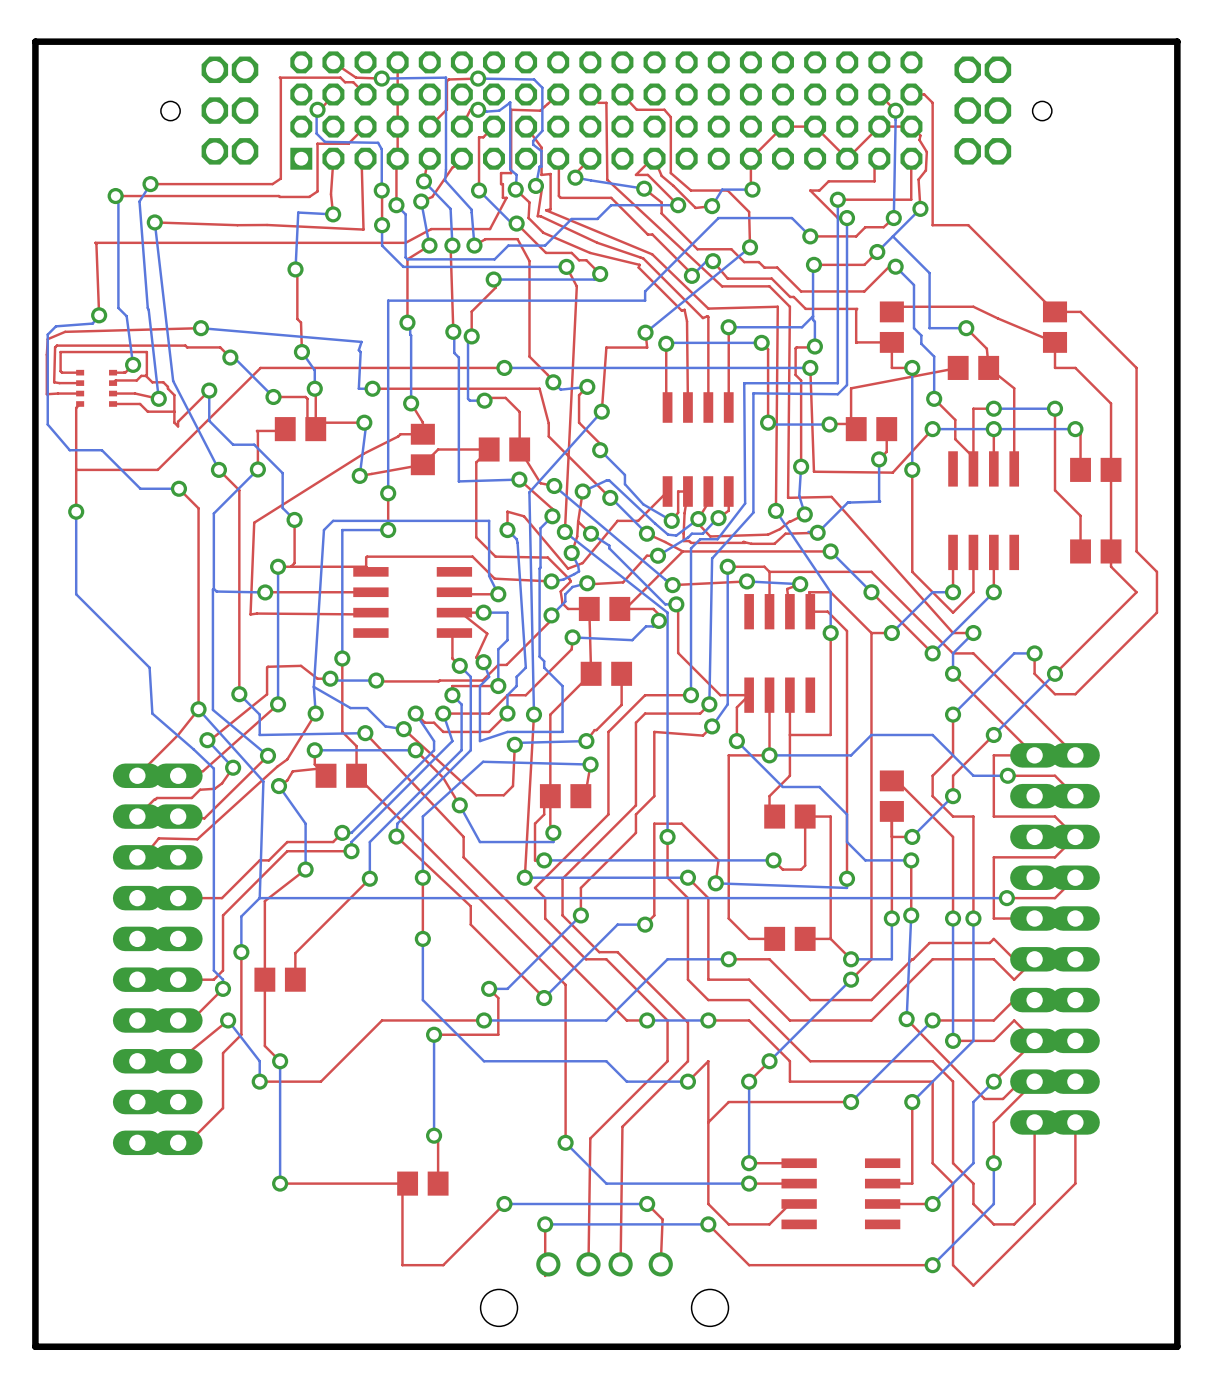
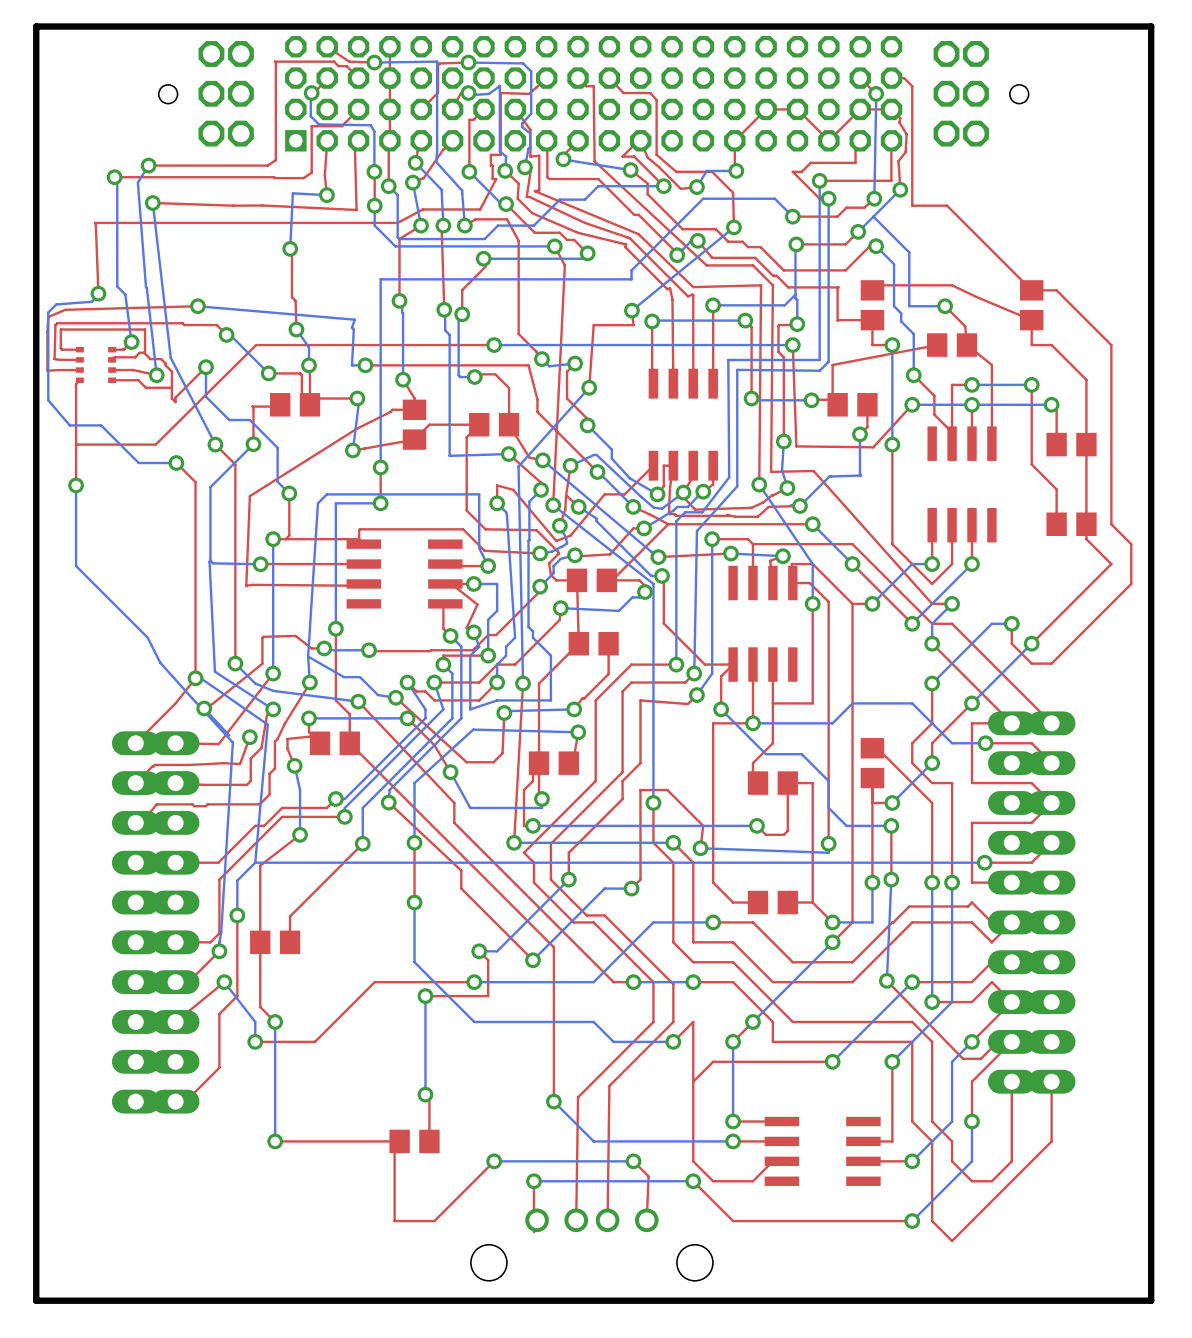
bottom track: (212, 589) (212, 709) (267, 755) -> (209, 561) (214, 671) (273, 709)
bottom track: (149, 667) (152, 713) (213, 768) (213, 970) (223, 979) -> (147, 637) (160, 662) (232, 742) (219, 942)
top track: (278, 704) (203, 771) (178, 775) -> (273, 673) (218, 744) (175, 743)
bottom track: (198, 709) (263, 781) (259, 898) -> (198, 676) (267, 724) (255, 862)
top track: (315, 713) (287, 759) (197, 839) (158, 838) -> (312, 678) (274, 741) (274, 768) (269, 773) (269, 794) (259, 804) (207, 804) (205, 806) (156, 804)
bottom track: (259, 714) (259, 734) (365, 733) -> (255, 683) (273, 690) (358, 701)
via: none -> (273, 709)
top track: (267, 755) (204, 818) (178, 816) -> (273, 709) (266, 715) (261, 747) (250, 758) (250, 781) (246, 784) (175, 783)
via: (267, 755) -> none
top track: (233, 767) (222, 783) (214, 788) (200, 789) (191, 798) -> (249, 737) (240, 764) (188, 764)
via: (233, 767) -> none
via: none -> (249, 737)
top track: (292, 771) (287, 780) (278, 786) -> (287, 738) (287, 748) (294, 765)
bottom track: (278, 786) (305, 823) -> (294, 765) (300, 790)
via: (278, 786) -> none
via: none -> (294, 765)

